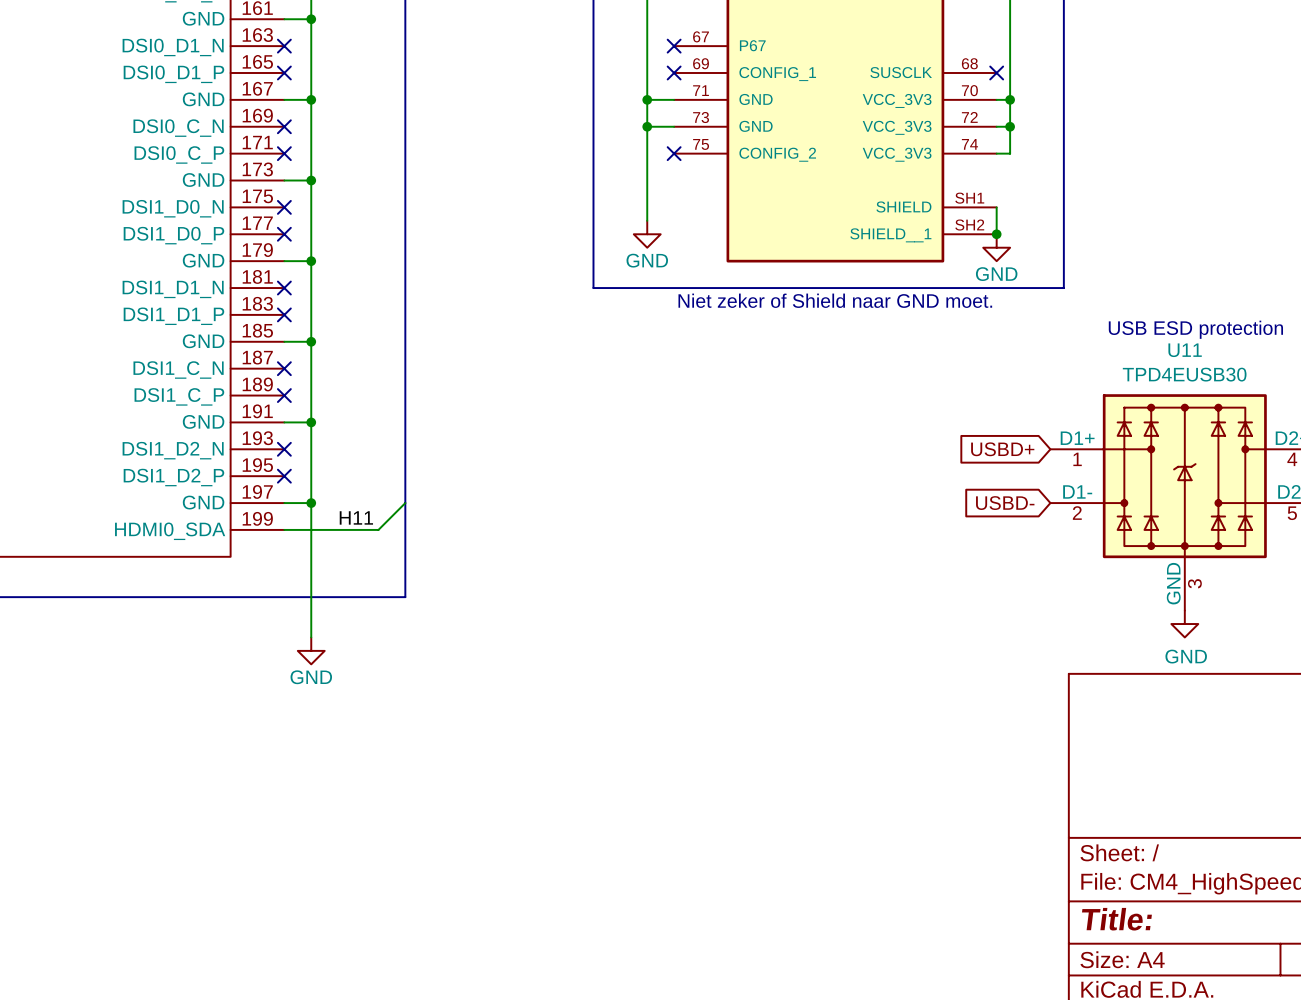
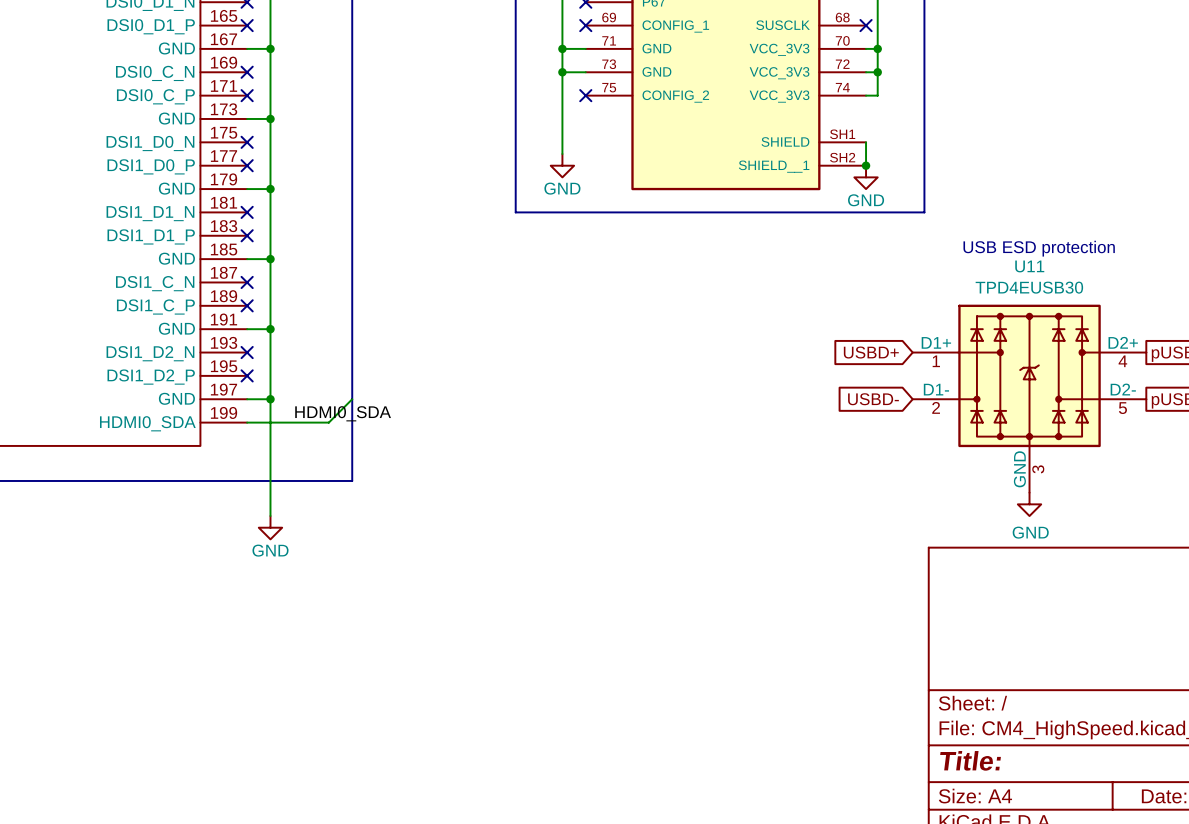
text: Niet zeker of Shield naar GND moet. (835, 300) -> none
label: H11 (356, 517) -> HDMI0_SDA (343, 413)

